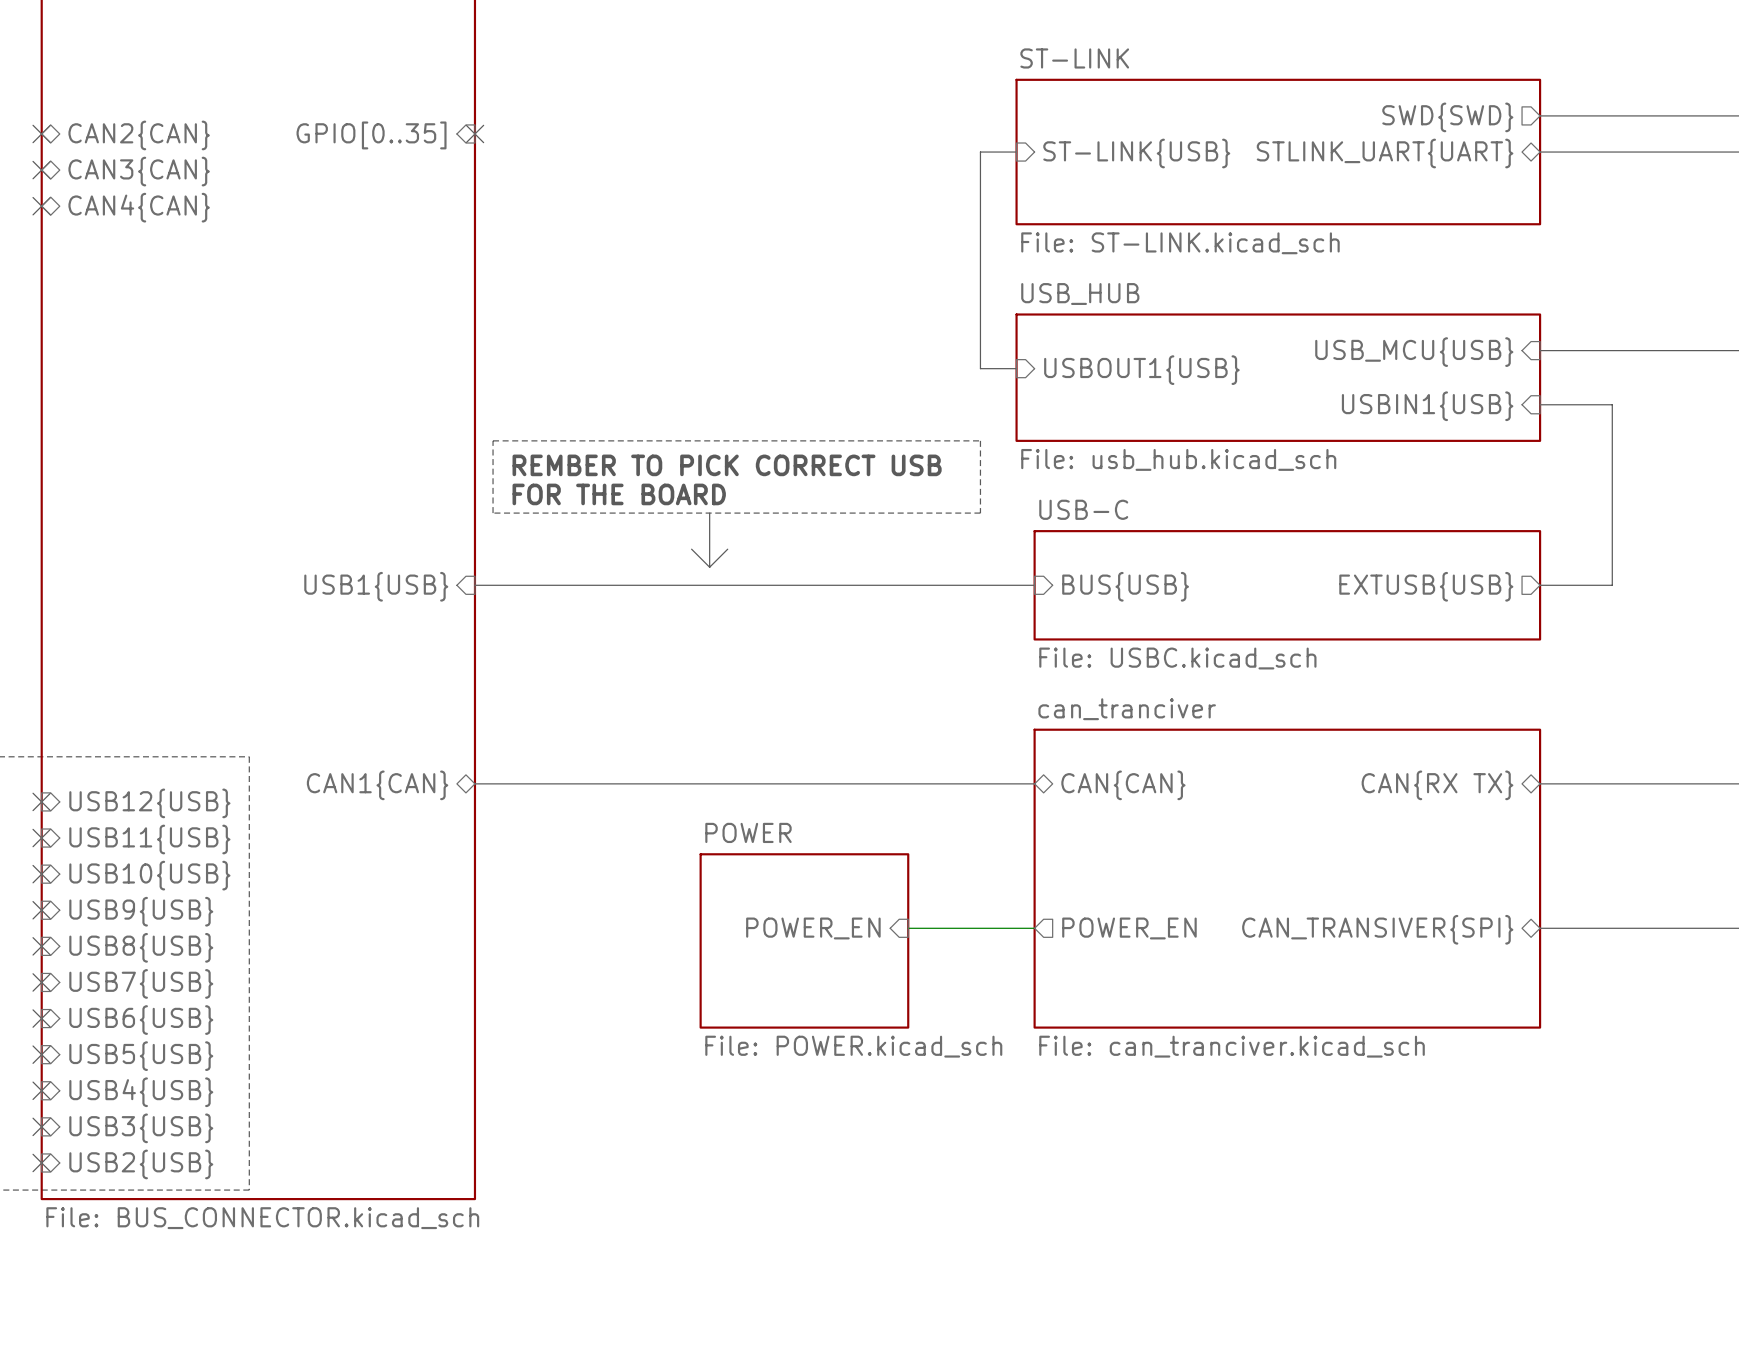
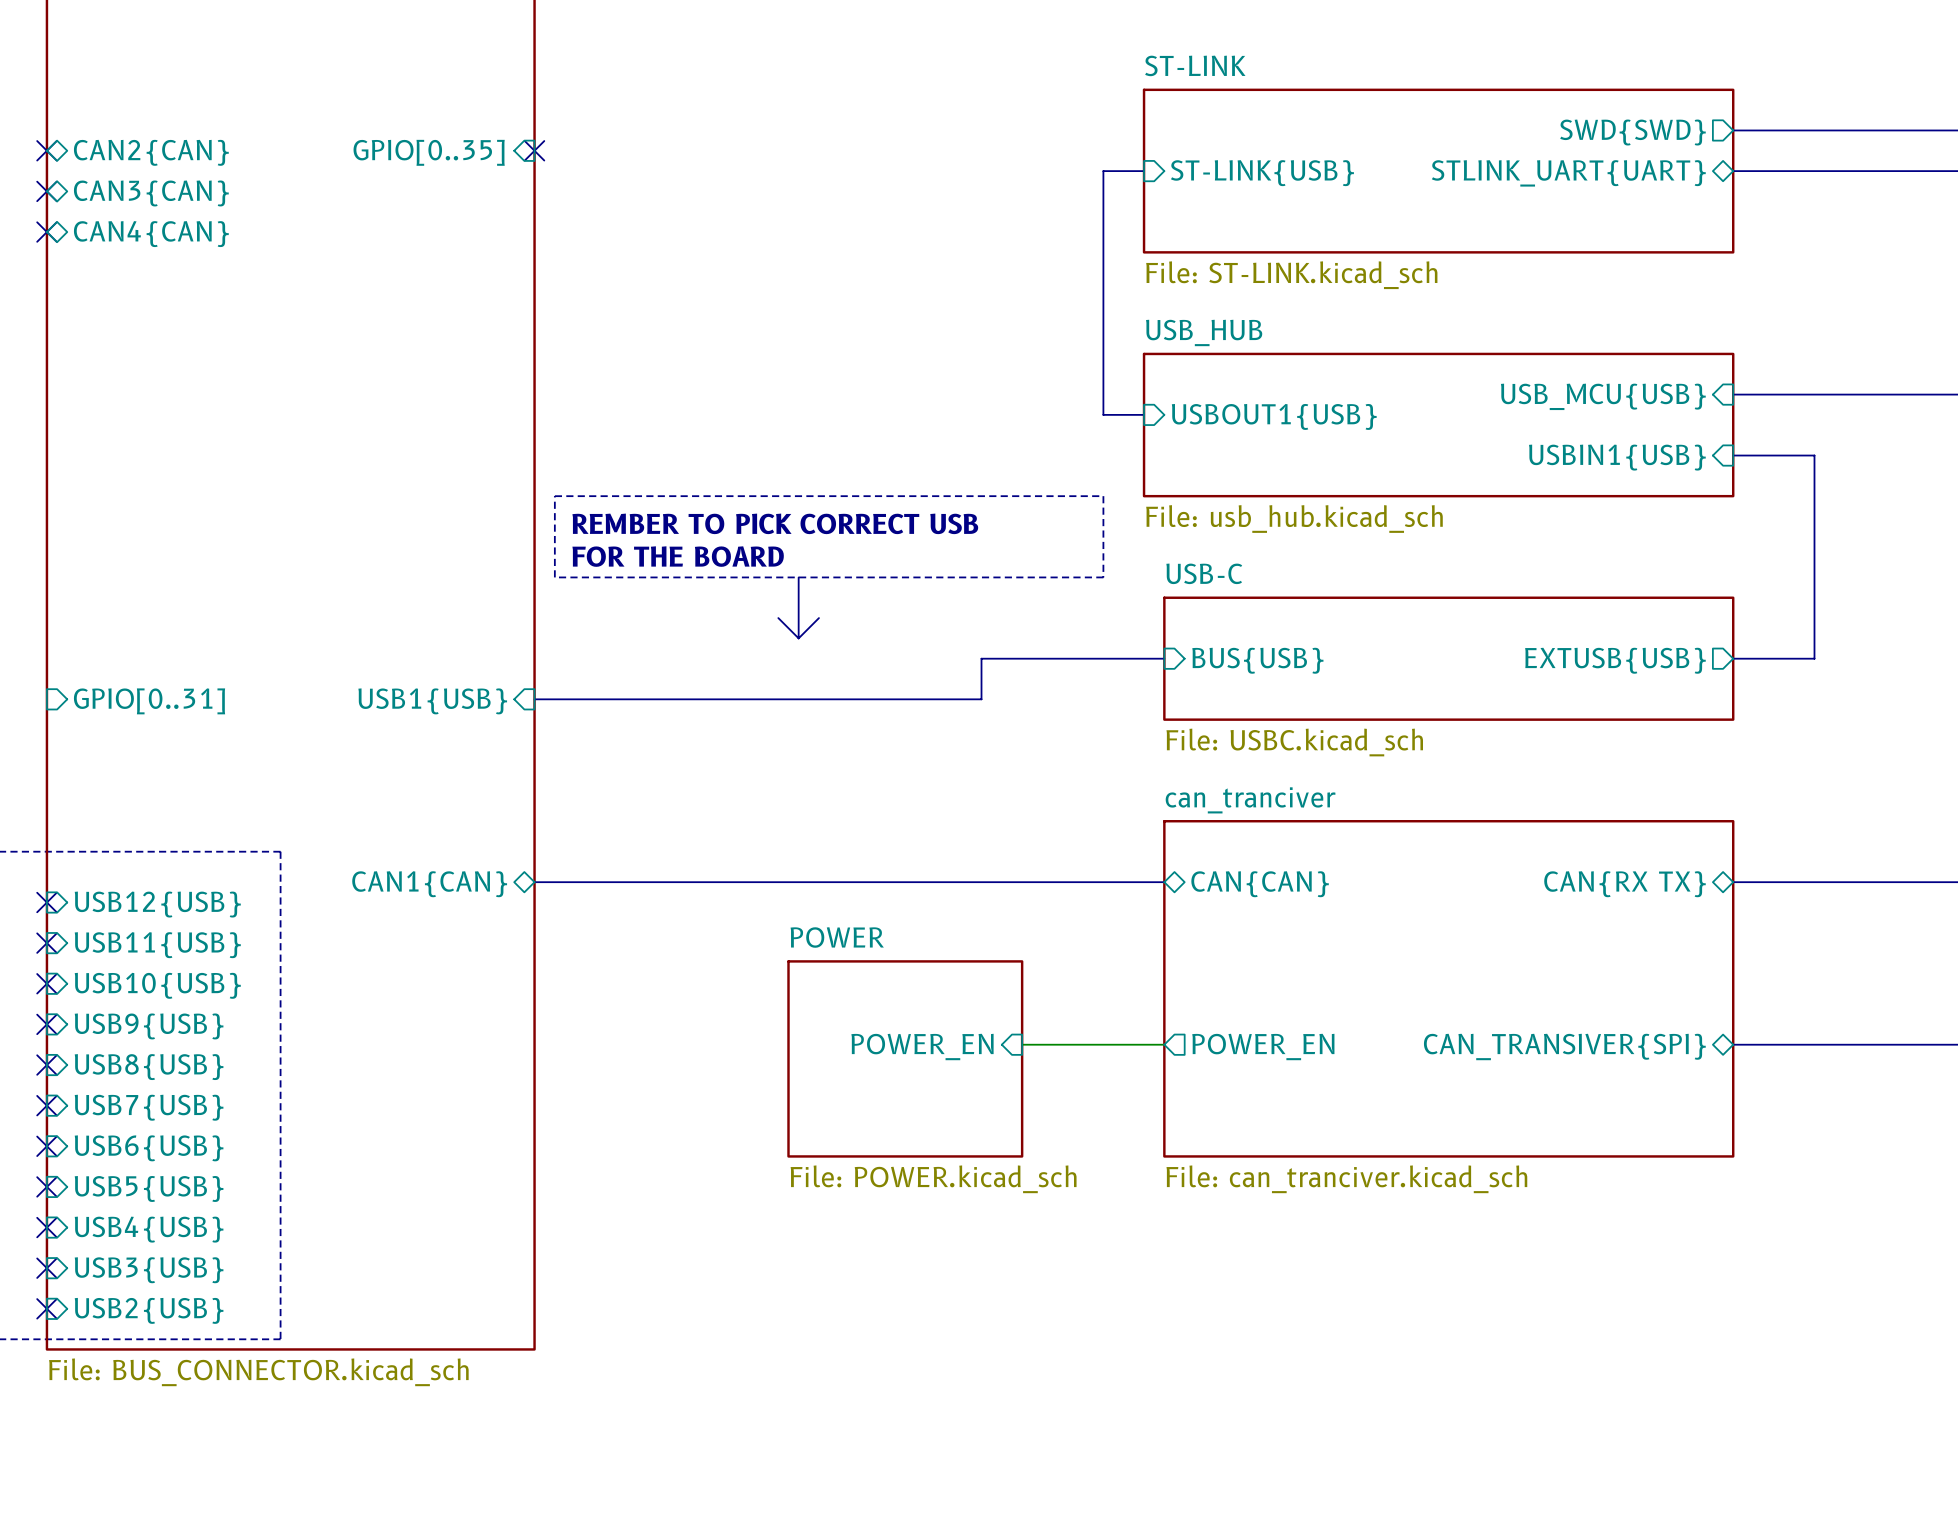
bus: (474, 585) (872, 585) -> (534, 699) (981, 699) (981, 658)
sheet pin position: USB1{USB} (376, 586) -> USB1{USB} (432, 701)
sheet pin: none -> GPIO[0..31] (149, 701)

